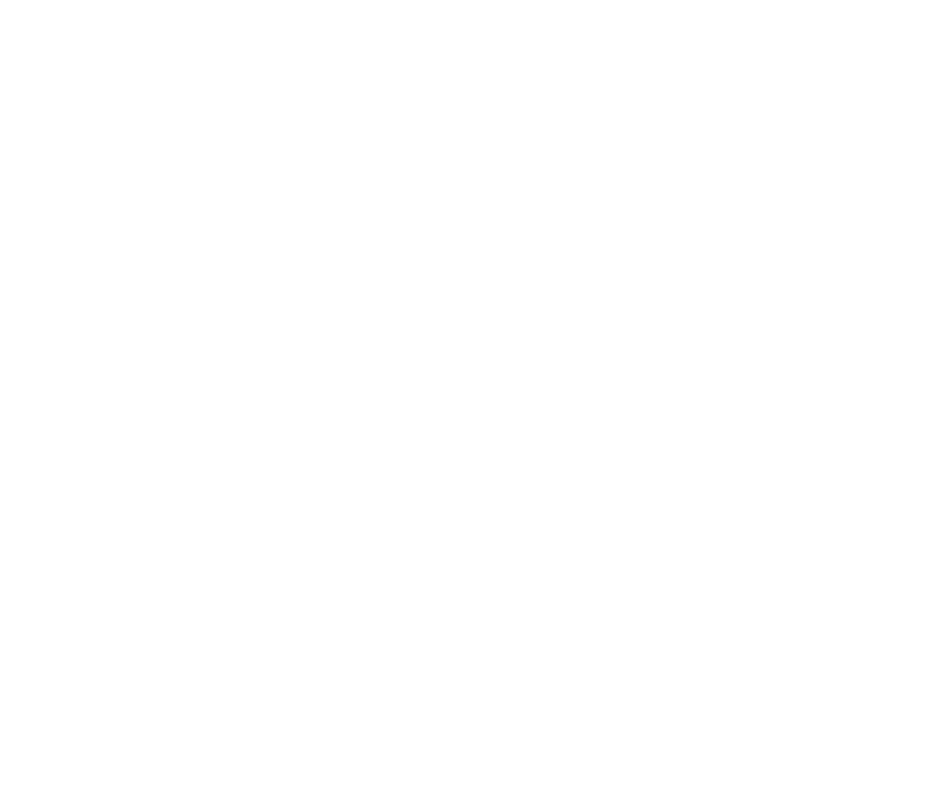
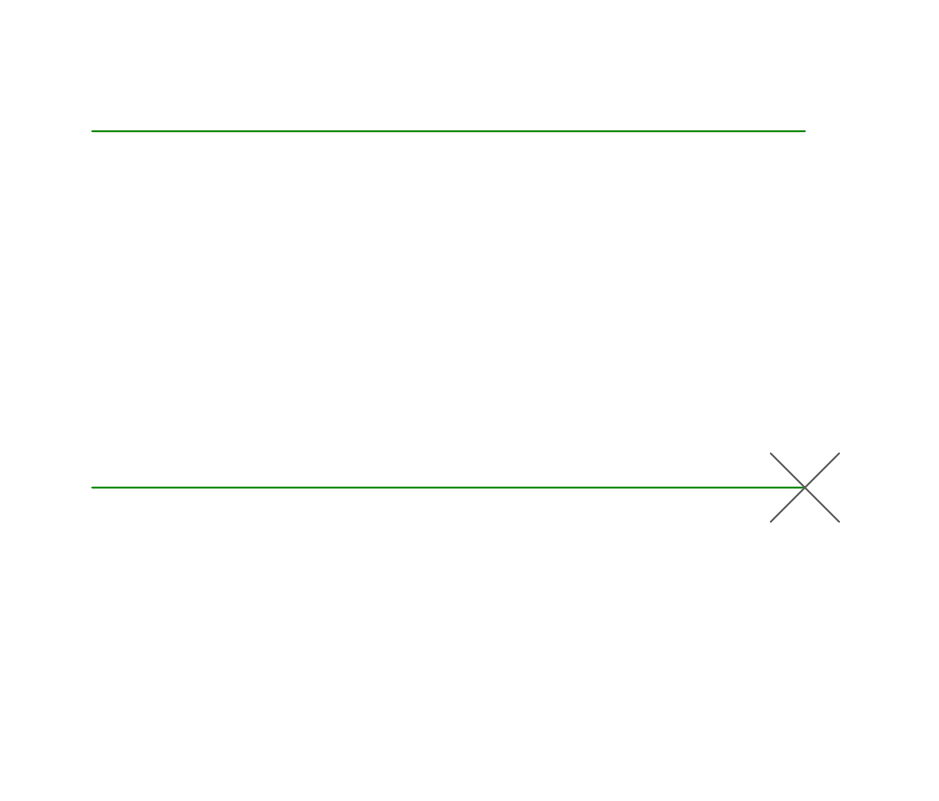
wire: none -> (92, 131) (804, 131)
wire: none -> (92, 487) (804, 487)
no-connect mark: none -> (804, 487)

